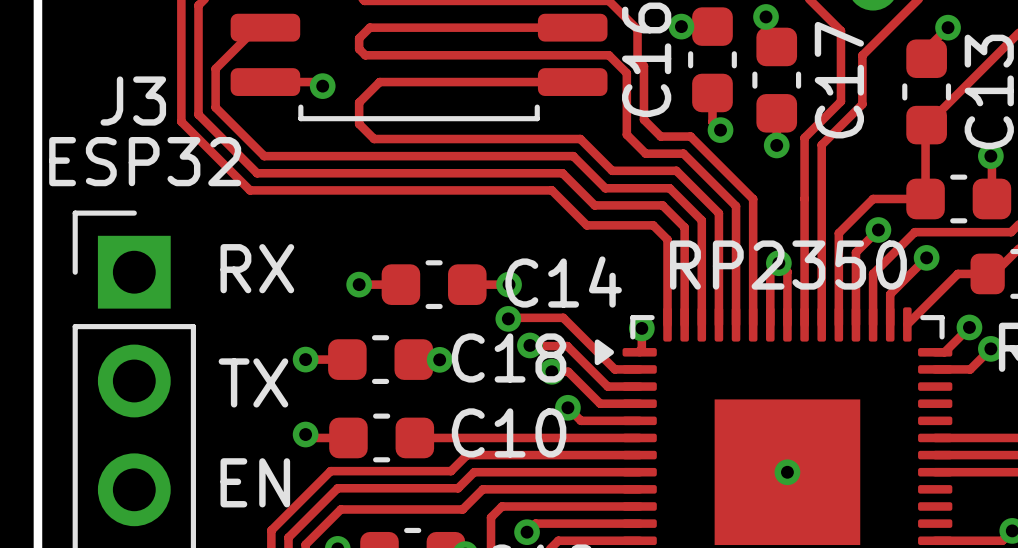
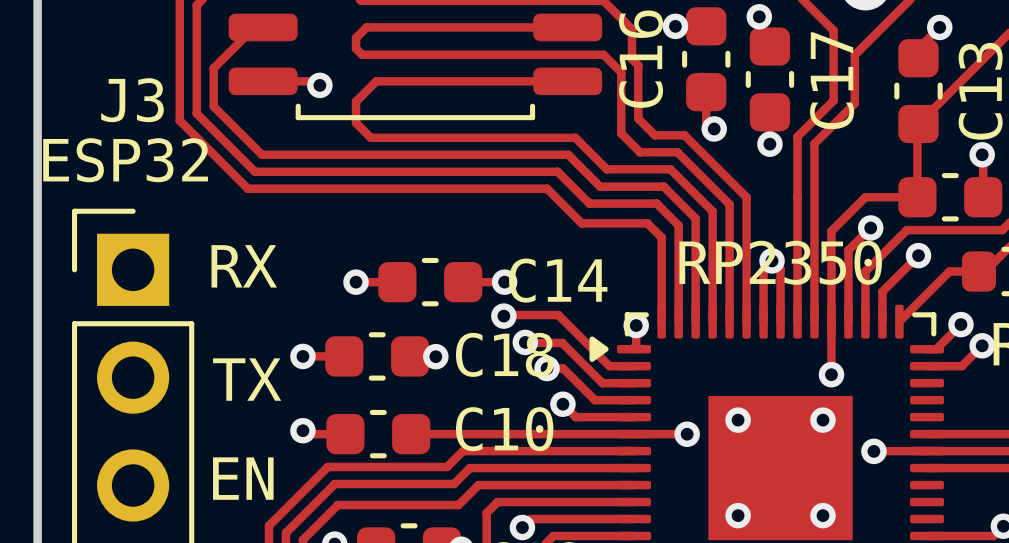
track: none -> (831, 321) (831, 374)
via: none -> (831, 374)
via: none -> (738, 420)
via: none -> (822, 420)
track: none -> (634, 434) (687, 434)
via: none -> (687, 434)
track: none -> (874, 451) (927, 451)
via: none -> (873, 451)
via: (787, 472) -> none
via: none -> (738, 515)
via: none -> (822, 515)

